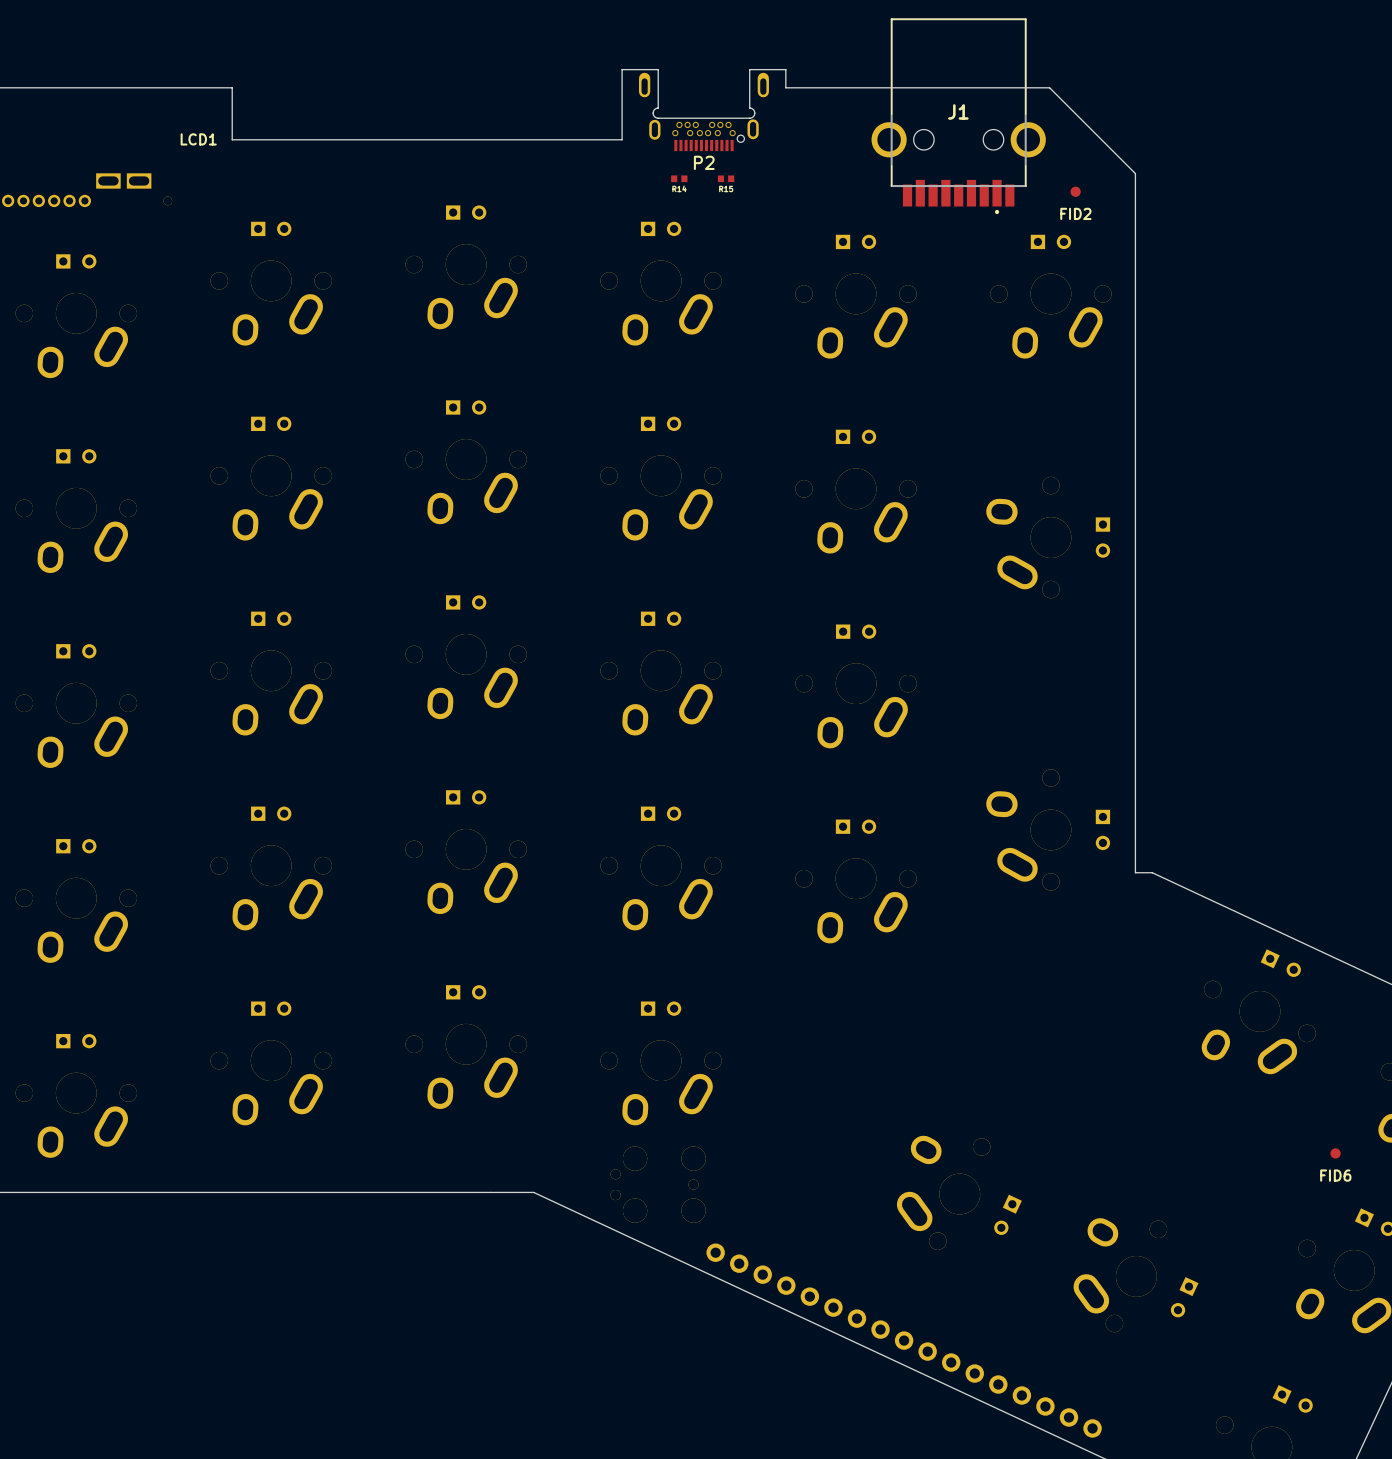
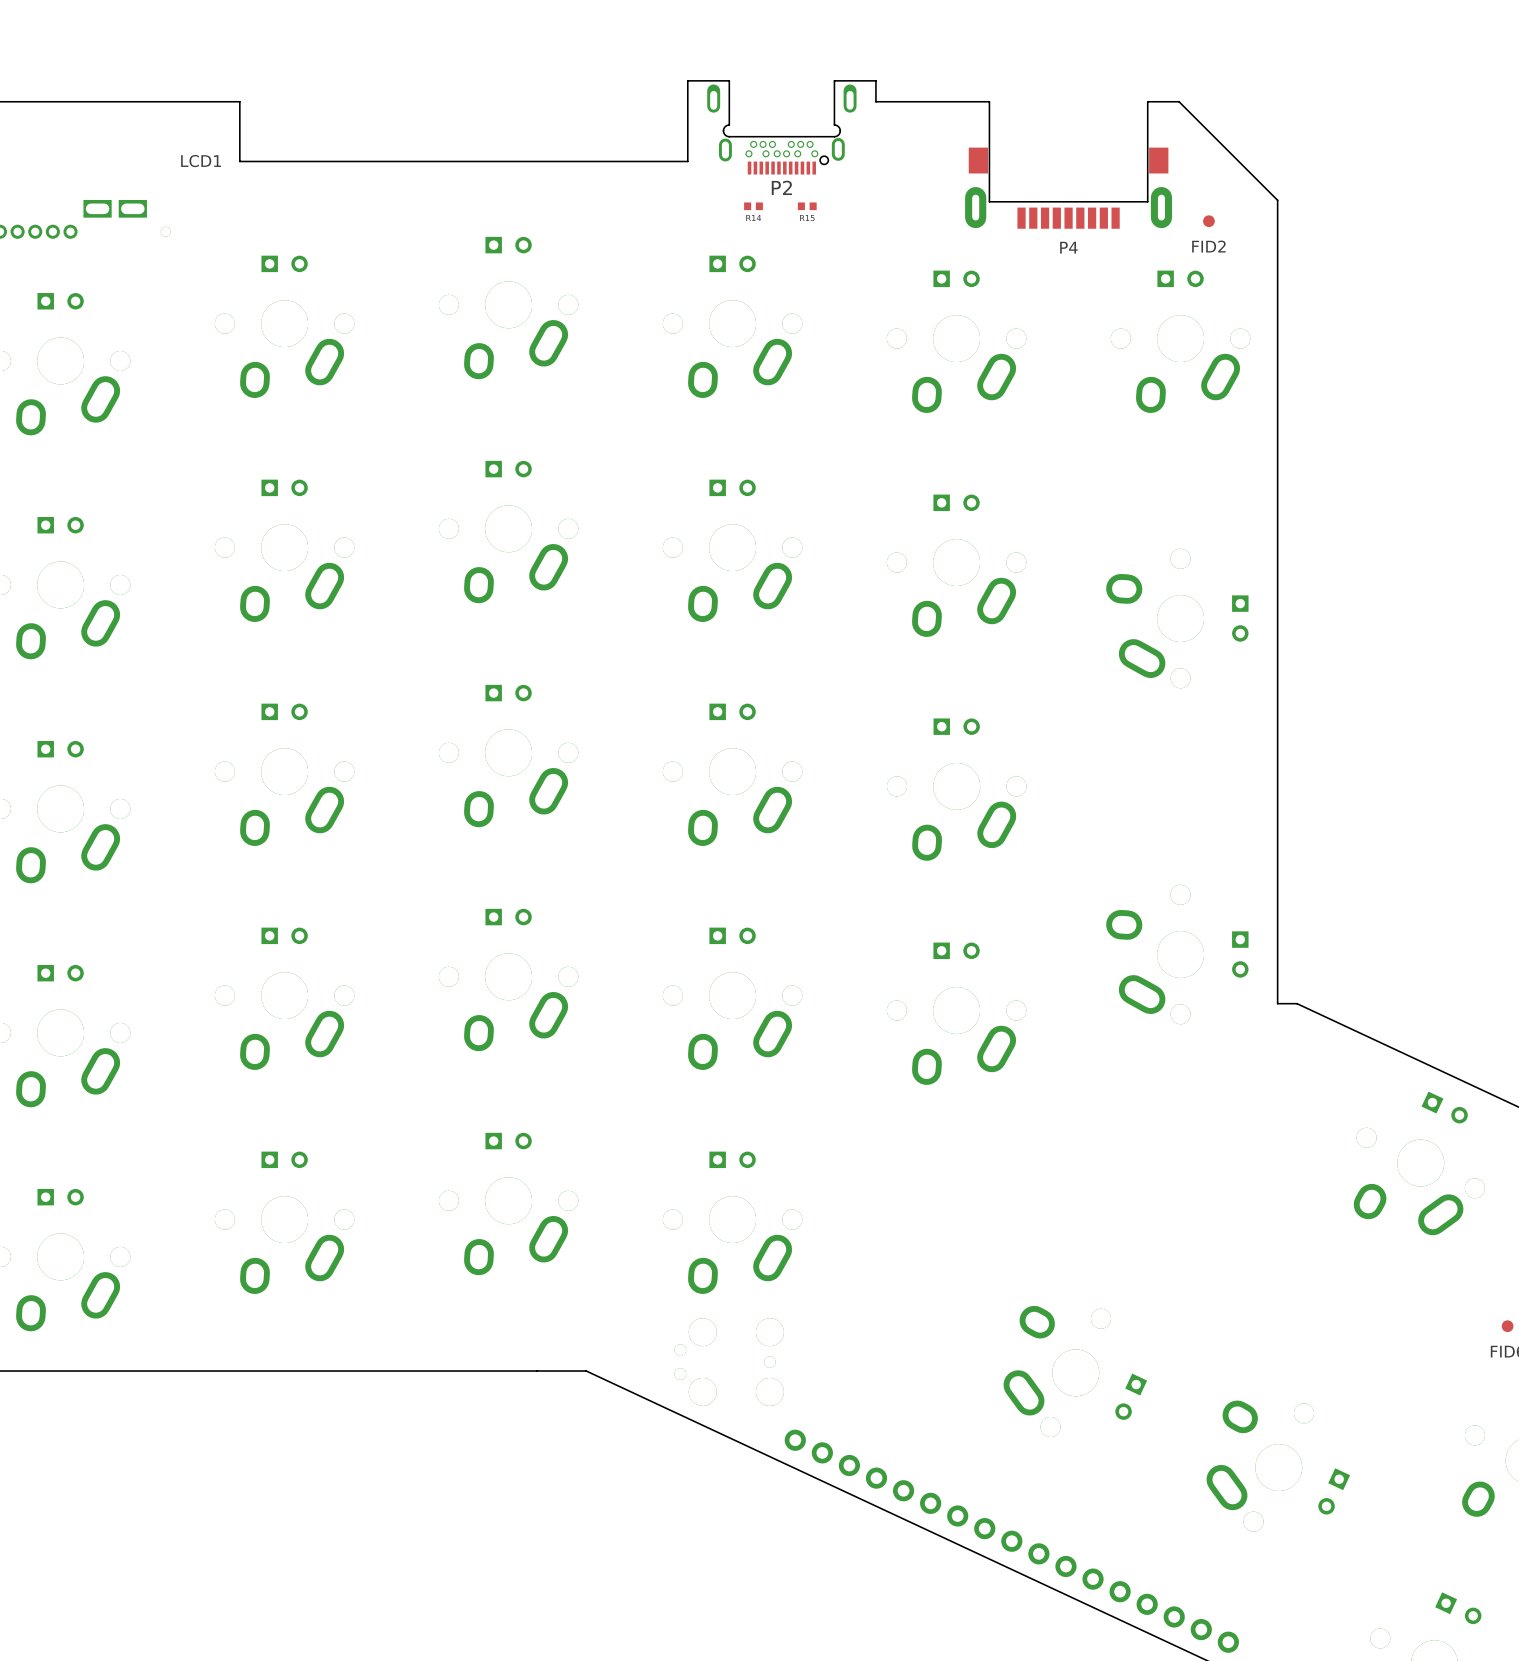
board edge: (884, 87) (1022, 87) -> (989, 101) (989, 201) (1147, 201) (1147, 101)
J1: (958, 116) -> none
P4: none -> (1068, 188)

